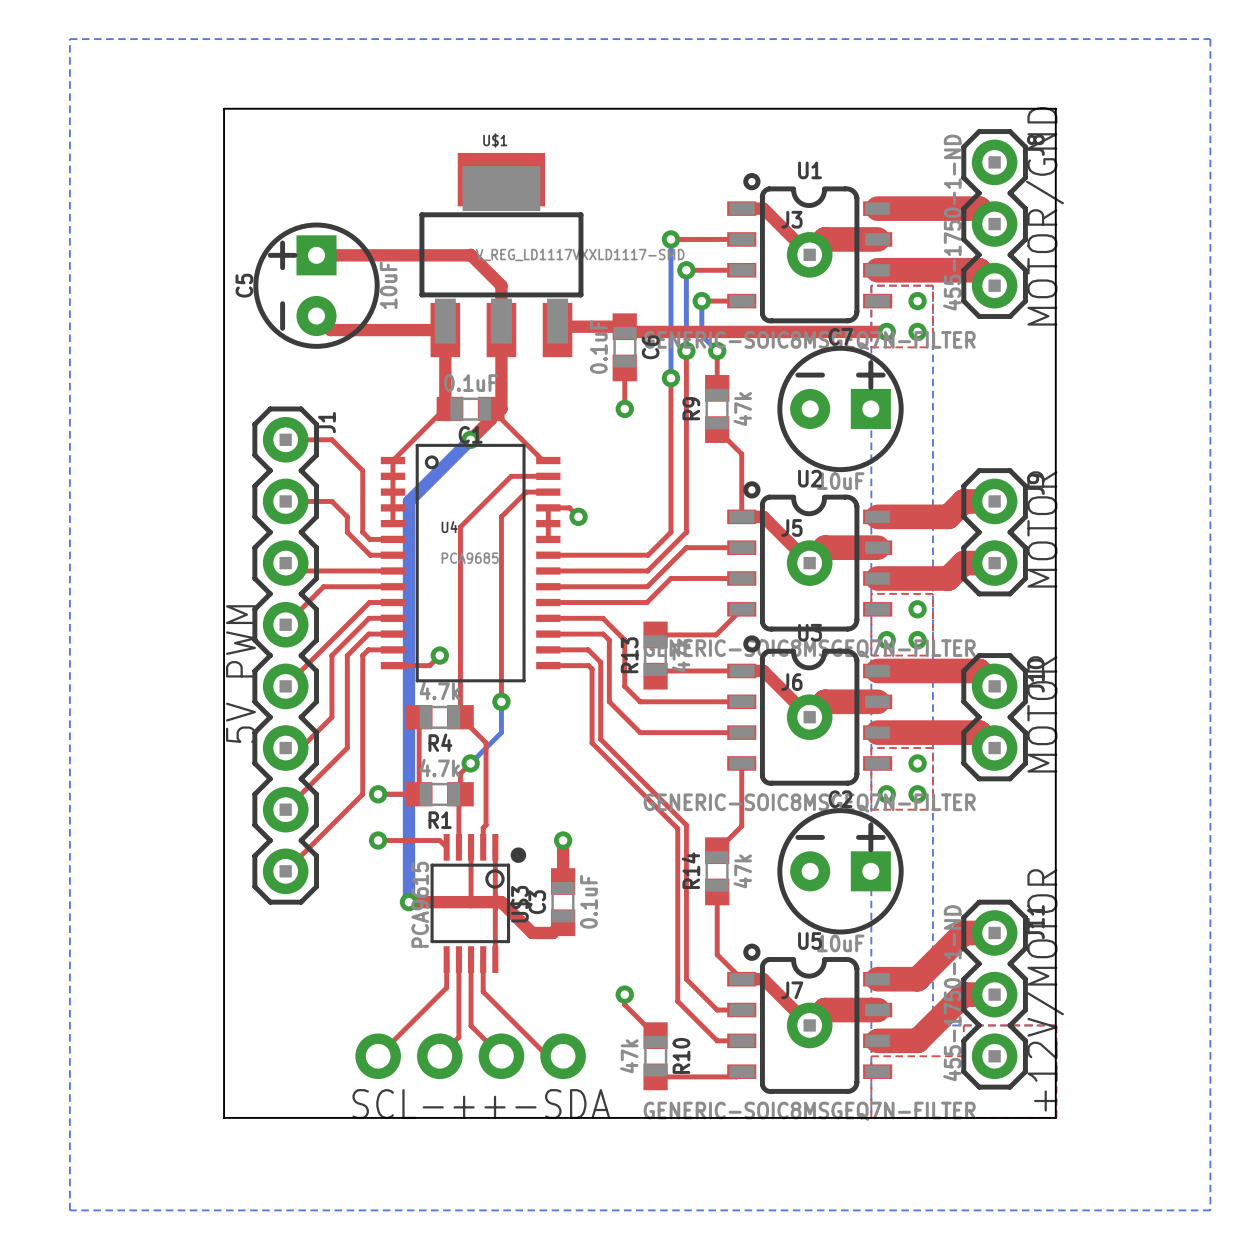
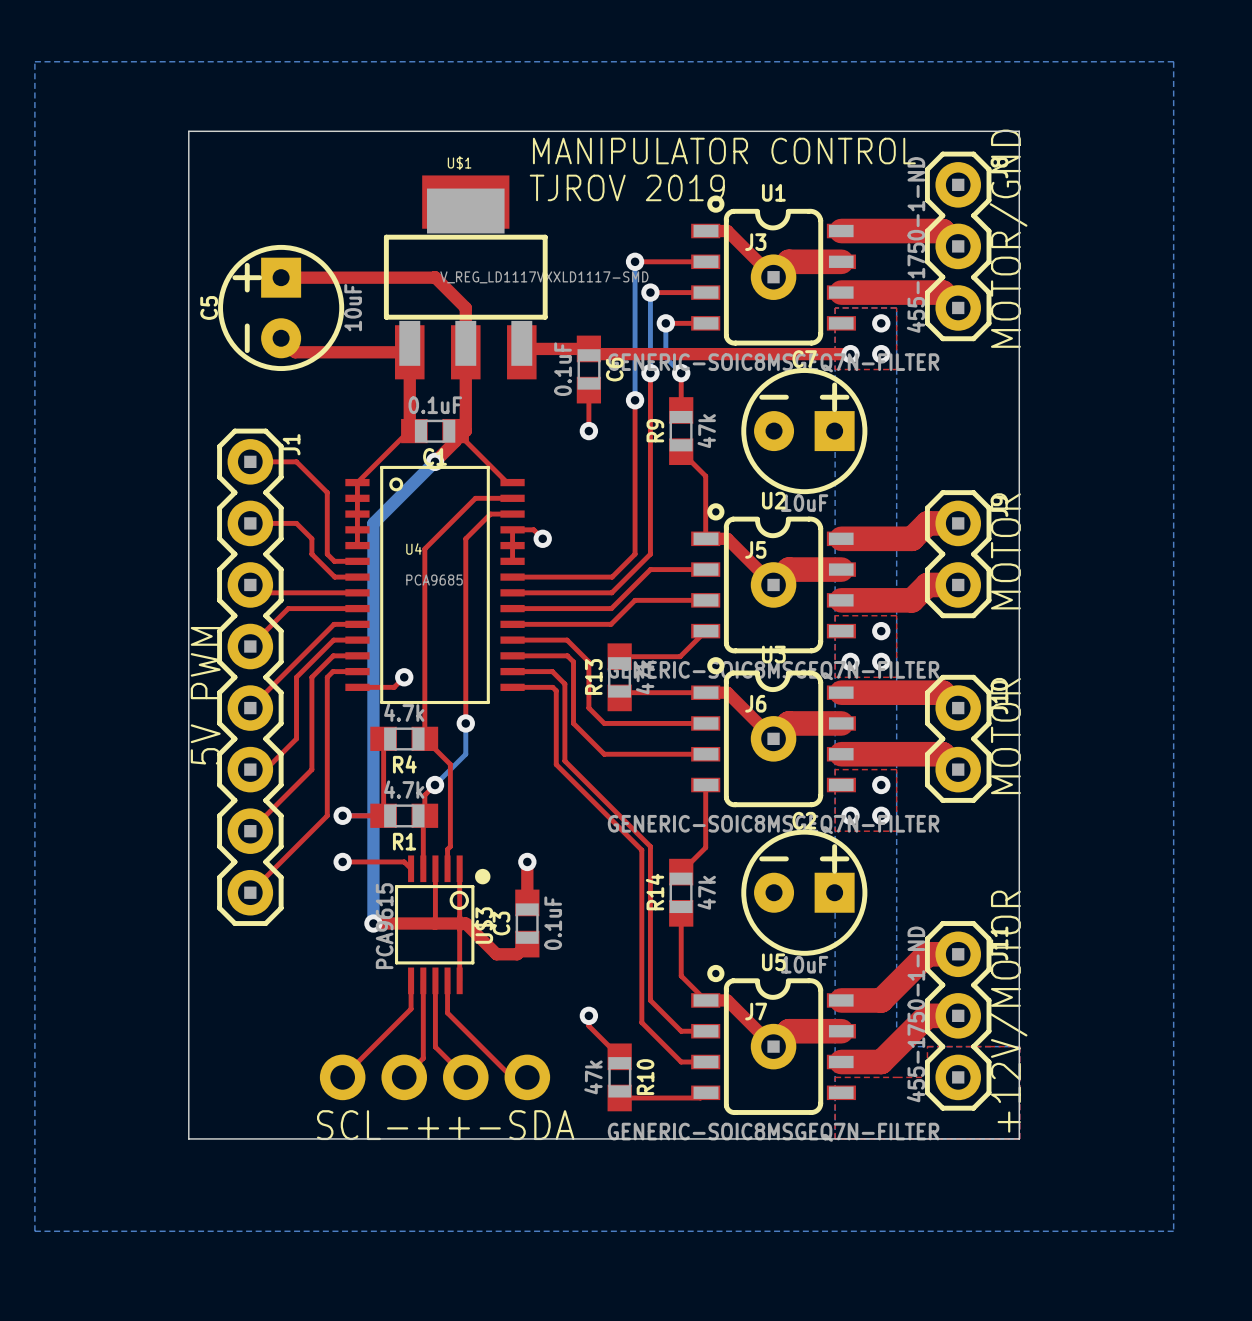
text: none -> MANIPULATOR CONTROL (724, 151)
text: none -> TJROV 2019 (627, 187)

